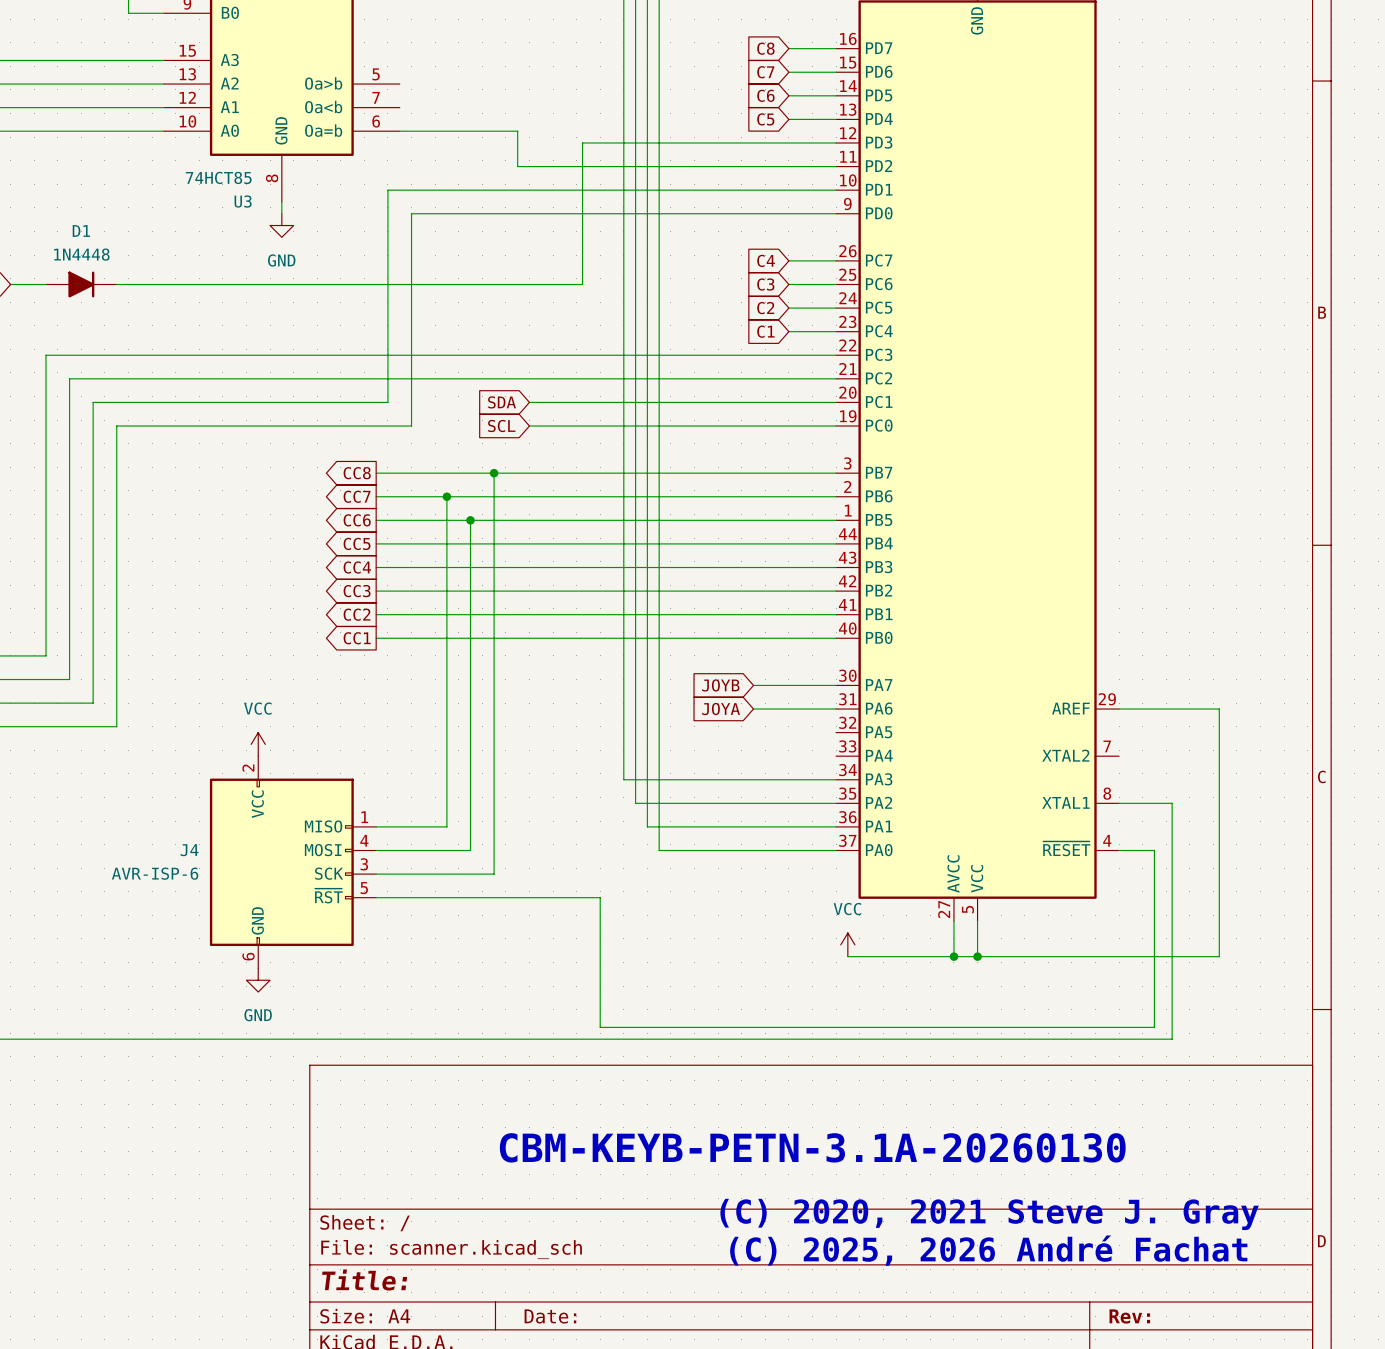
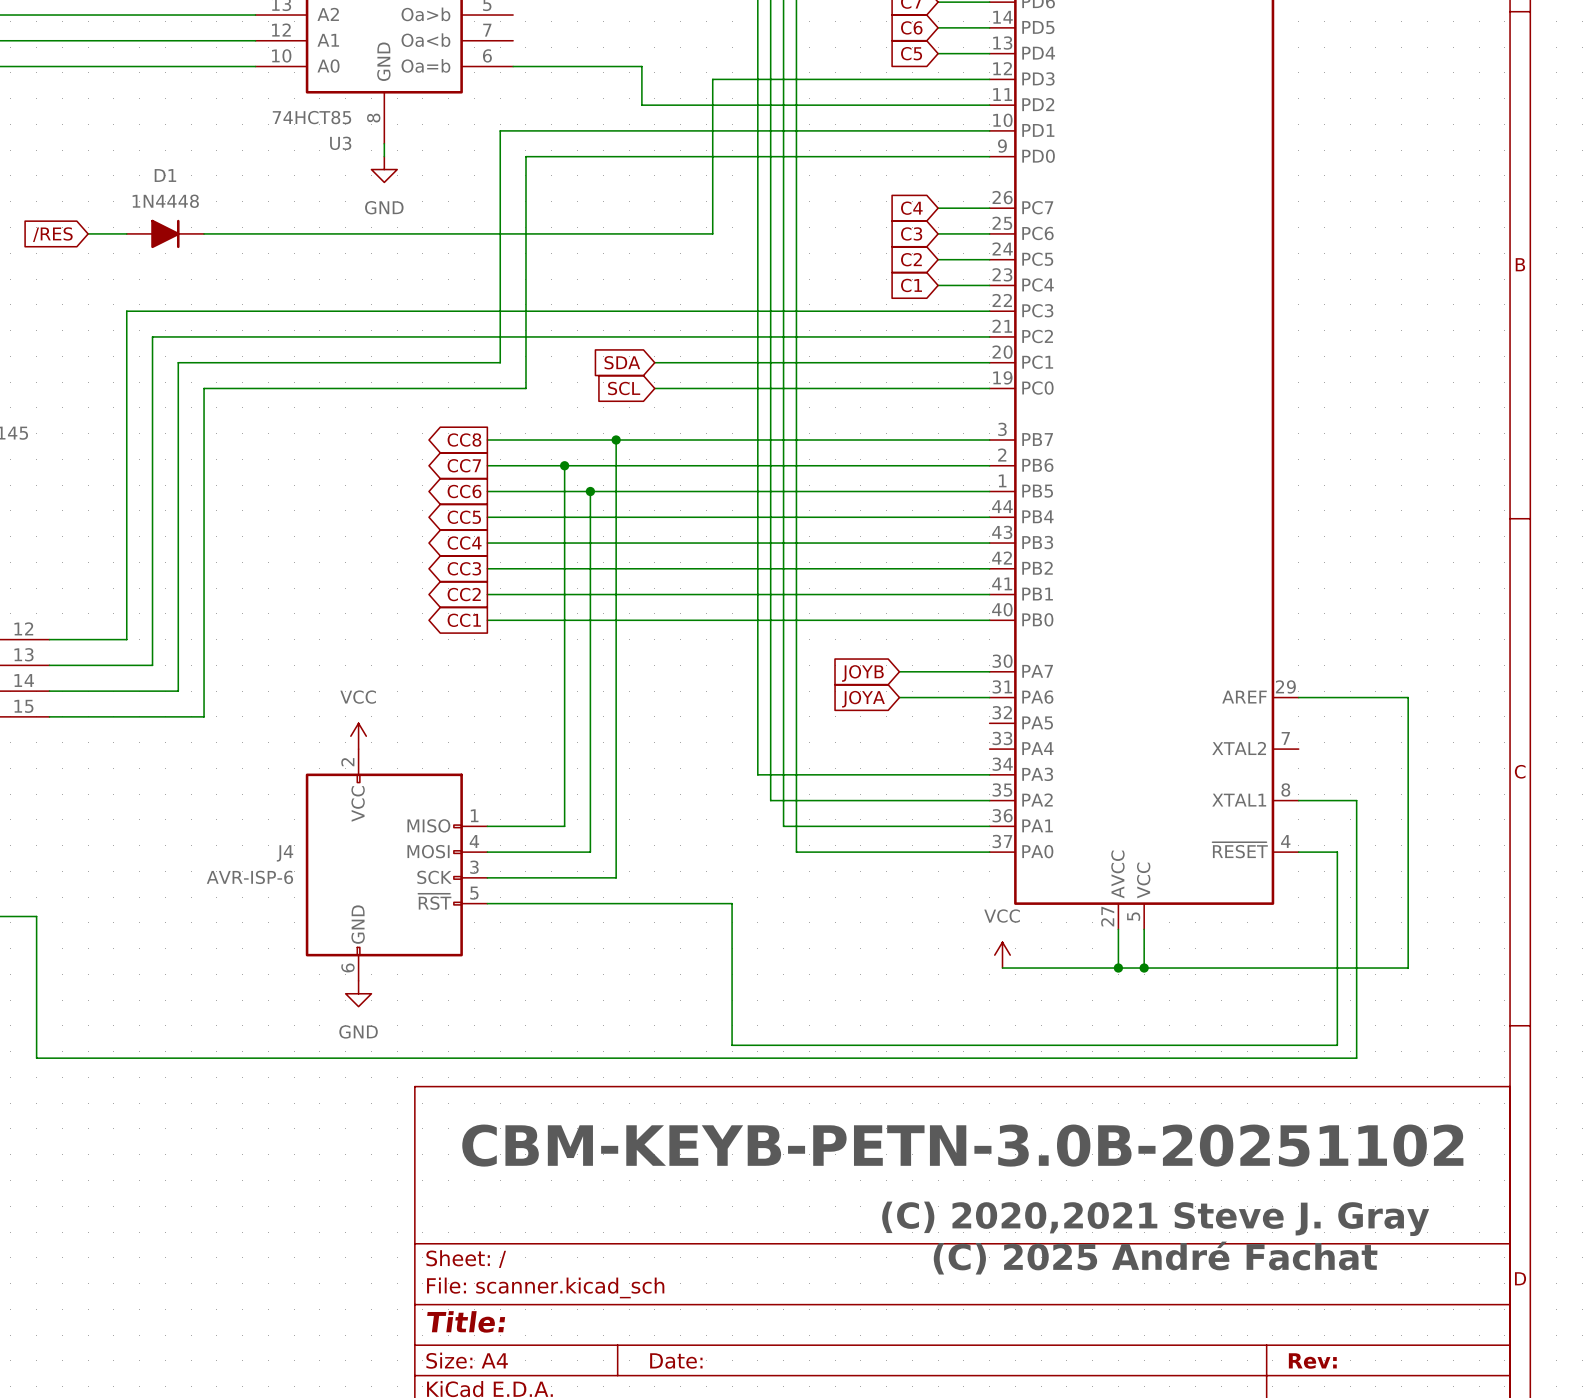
text: CBM-KEYB-PETN-3.1A-20260130 (812, 1147) -> CBM-KEYB-PETN-3.0B-20251102 (962, 1145)
text: (C) 2020, 2021 Steve J. Gray (989, 1214) -> (C) 2020,2021 Steve J. Gray (1155, 1218)
text: (C) 2025, 2026 André Fachat (988, 1250) -> (C) 2025 André Fachat (1155, 1258)

